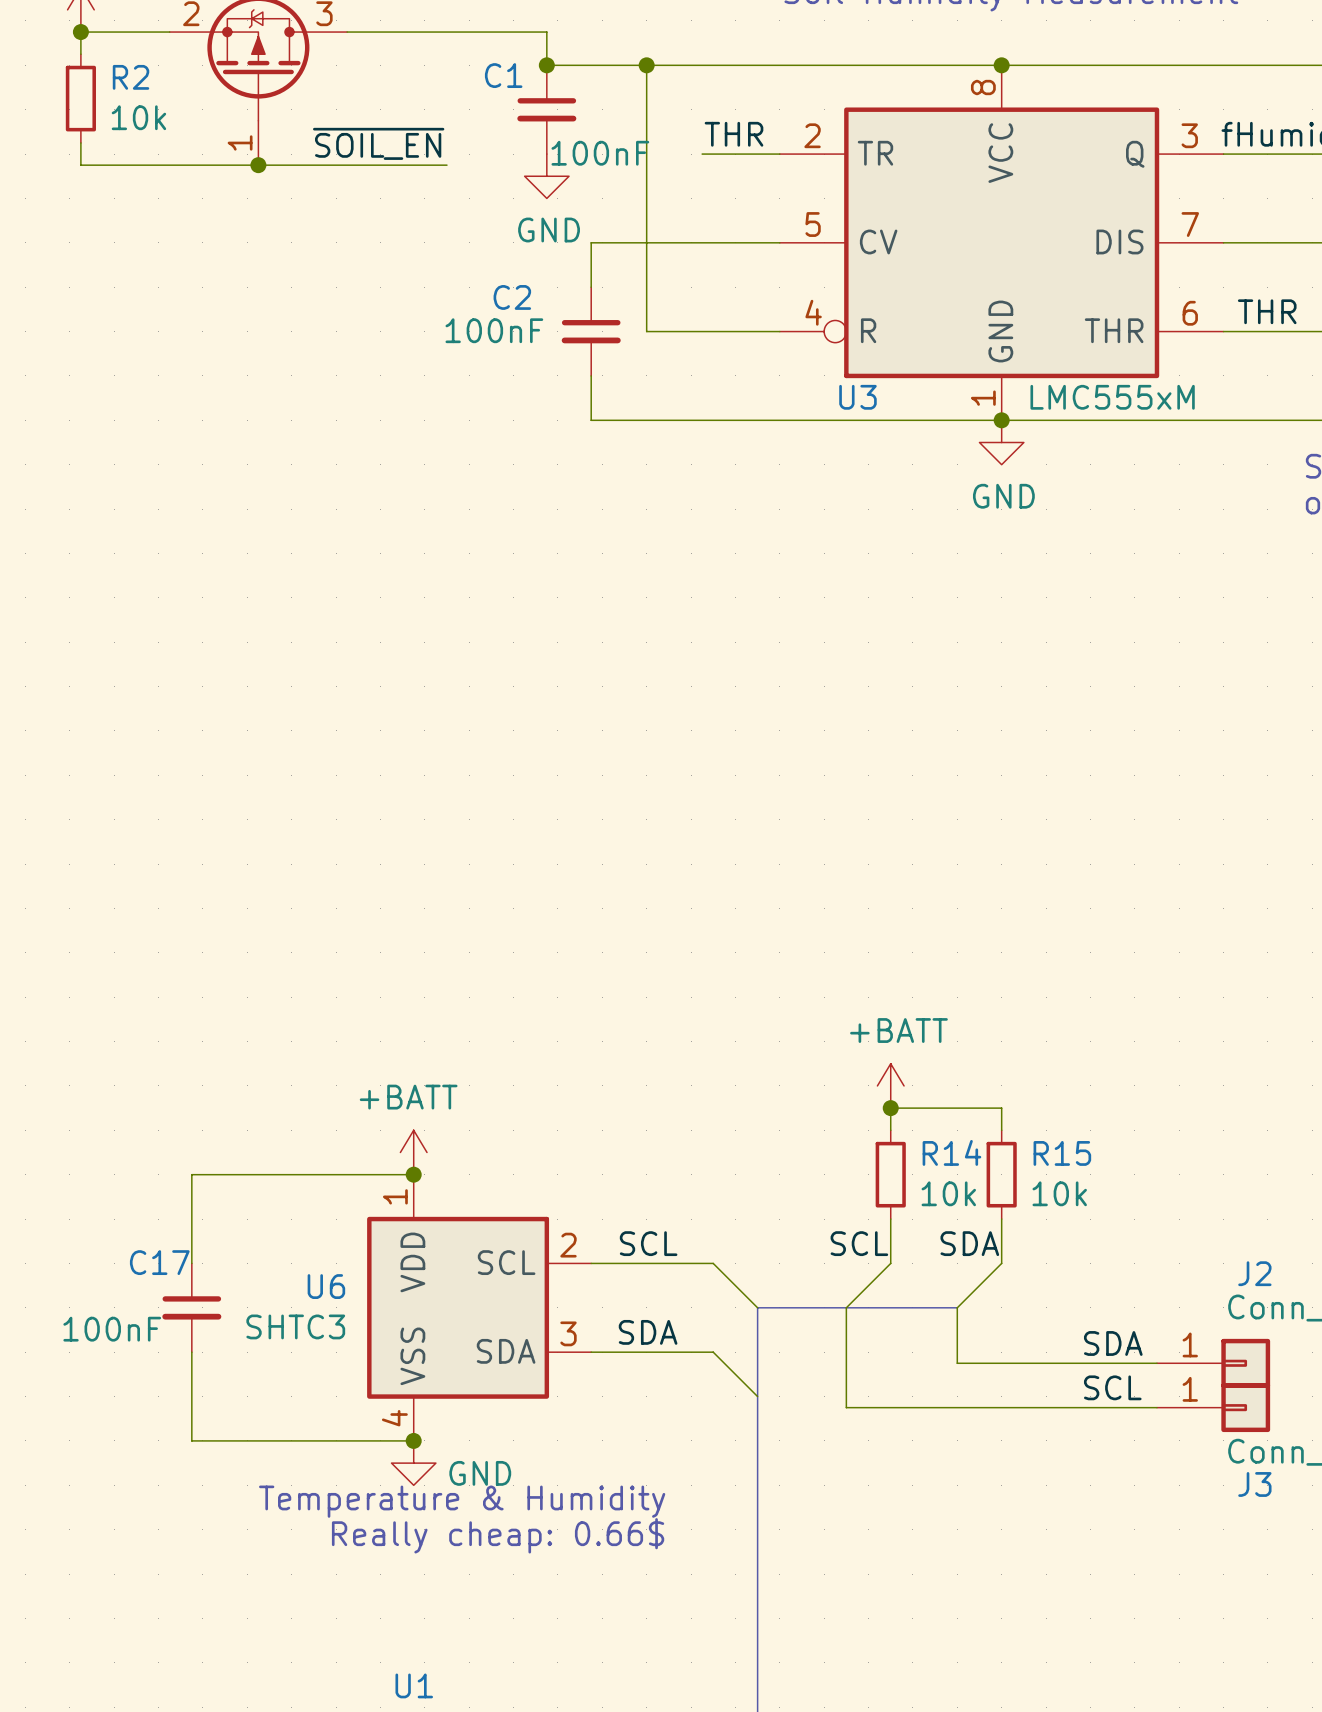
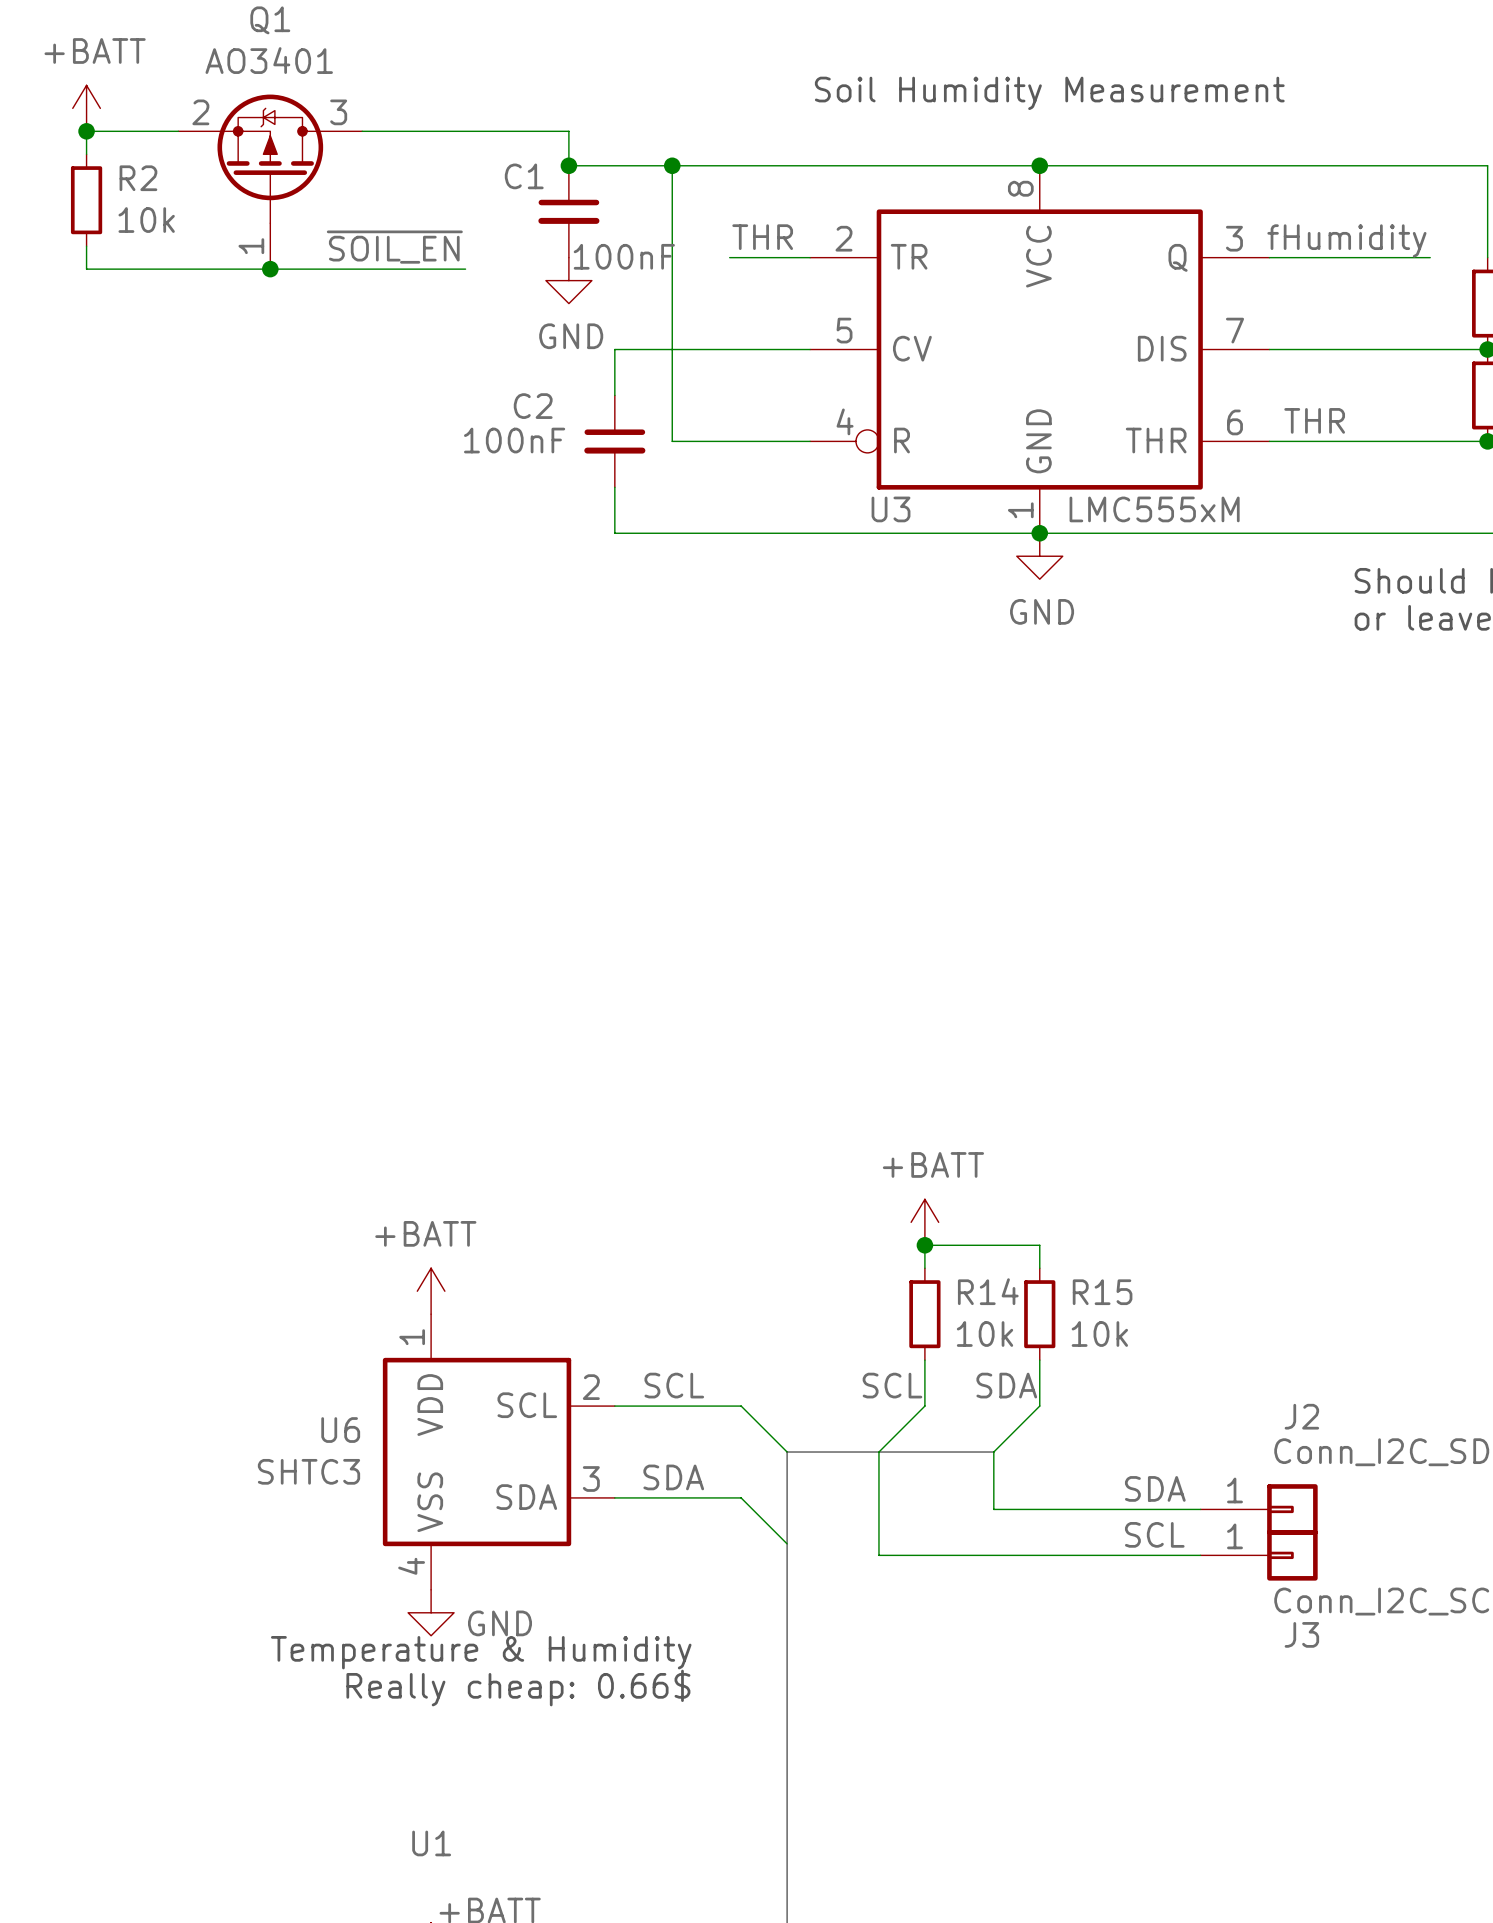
wire: (413, 1174) (191, 1174) (191, 1263) -> none
junction: (413, 1174) -> none
C17: 100nF (191, 1307) -> none
wire: (191, 1352) (191, 1440) (413, 1440) -> none
junction: (413, 1440) -> none

